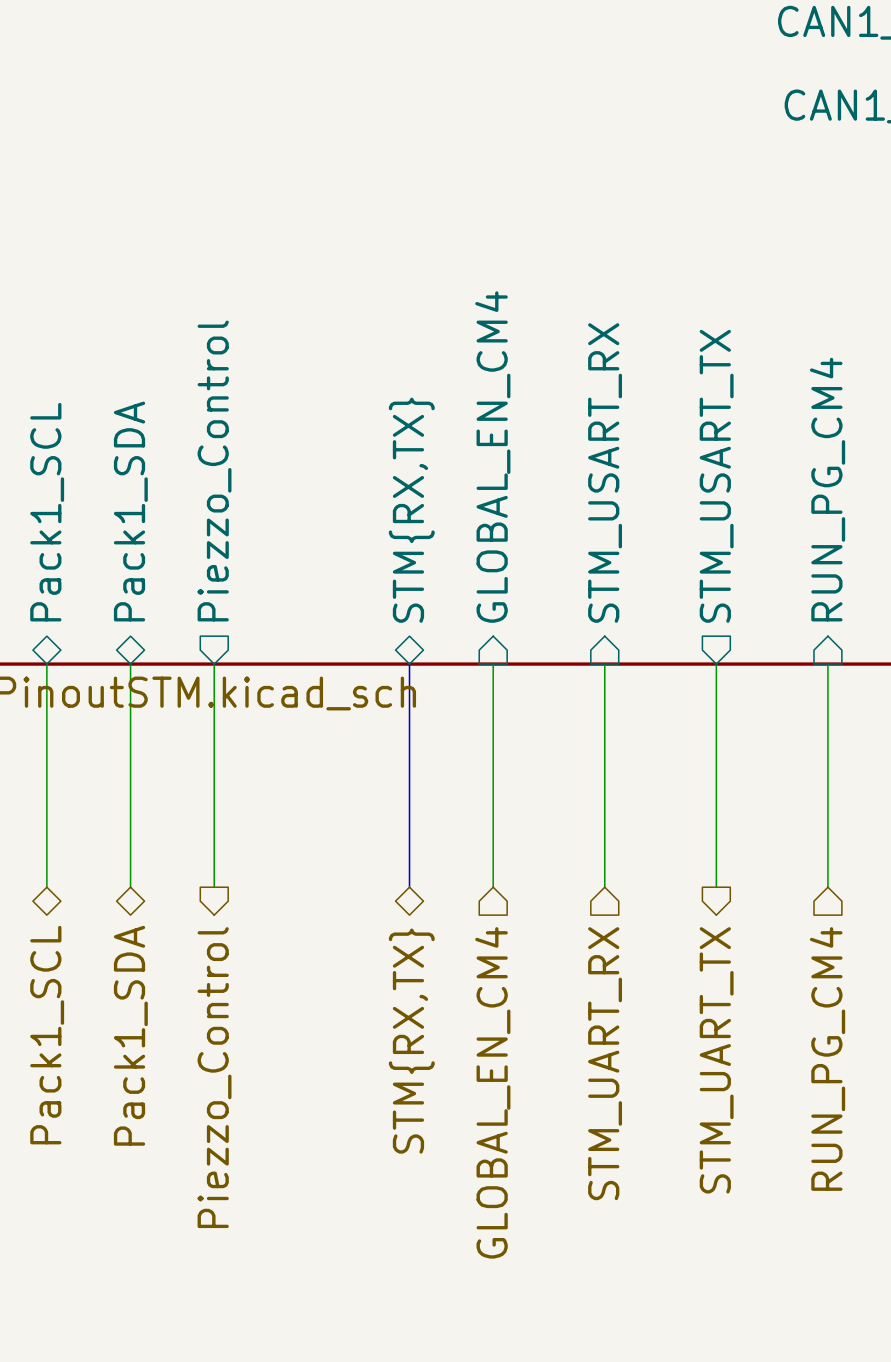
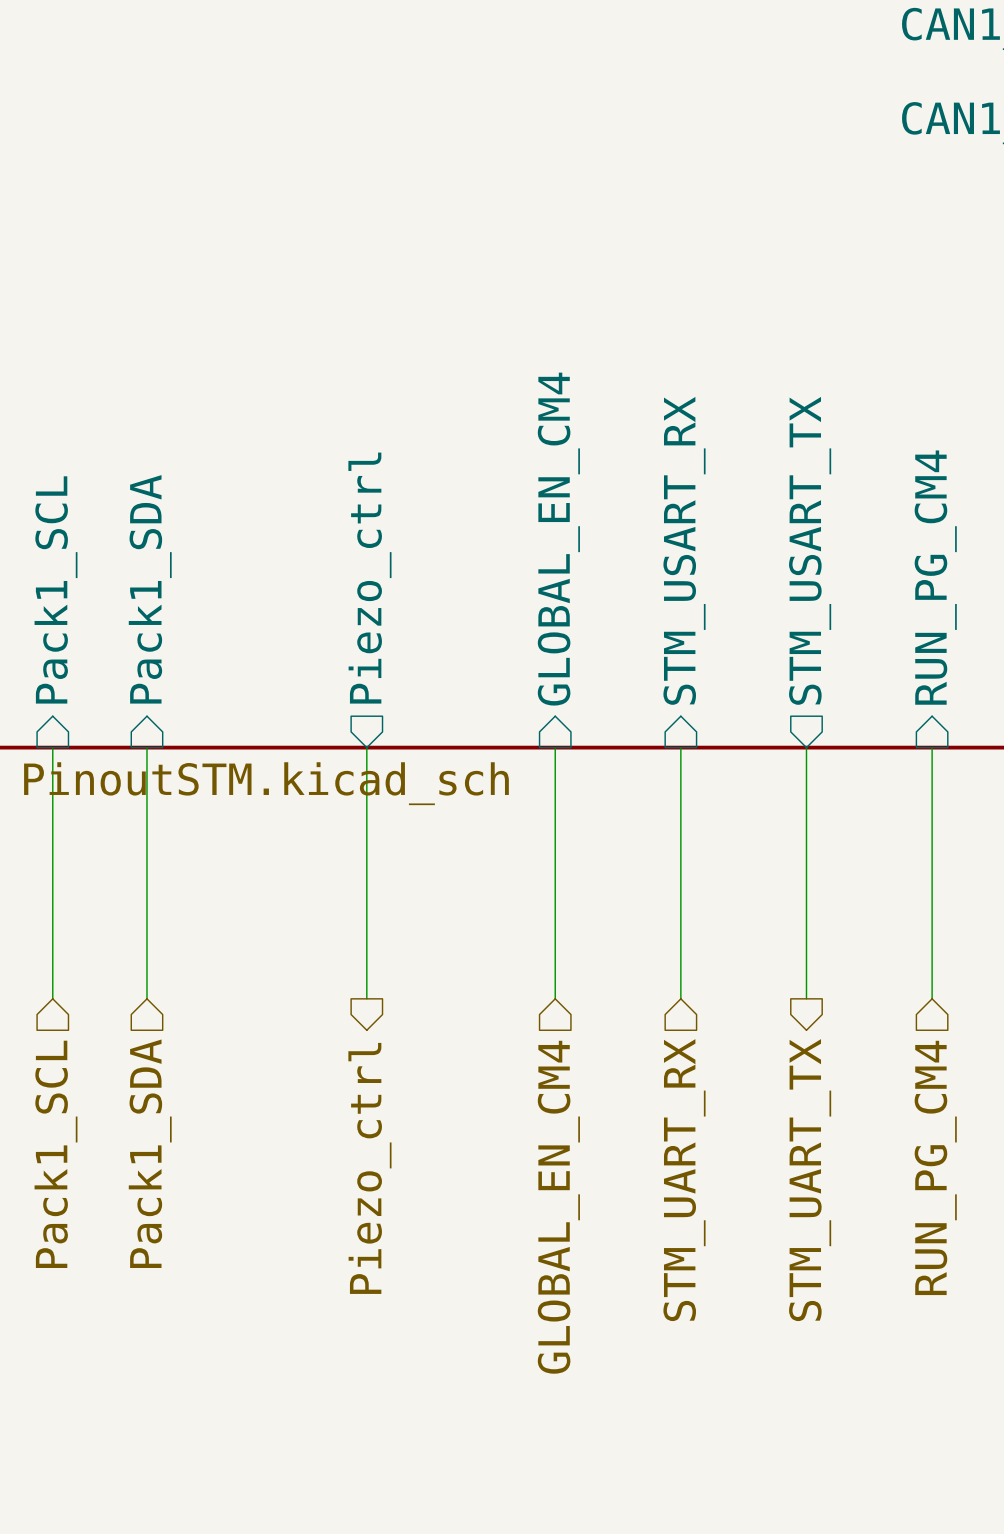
sheet pin: Piezzo_Control (214, 471) -> none
sheet pin: STM{RX,TX} (411, 510) -> none
sheet pin shape: bidirectional (130, 511) -> input (150, 589)
sheet pin shape: bidirectional (47, 512) -> input (56, 589)
sheet pin: none -> Piezo_ctrl (369, 578)
wire: (214, 664) (214, 887) -> (366, 747) (366, 998)
bus: (409, 664) (409, 887) -> none
hierarchical label: none -> Piezo_ctrl (369, 1168)
hierarchical label shape: bidirectional (47, 1035) -> input (56, 1154)
hierarchical label shape: bidirectional (130, 1035) -> input (150, 1153)
hierarchical label: STM{RX,TX} (411, 1041) -> none
hierarchical label: Piezzo_Control (214, 1077) -> none

